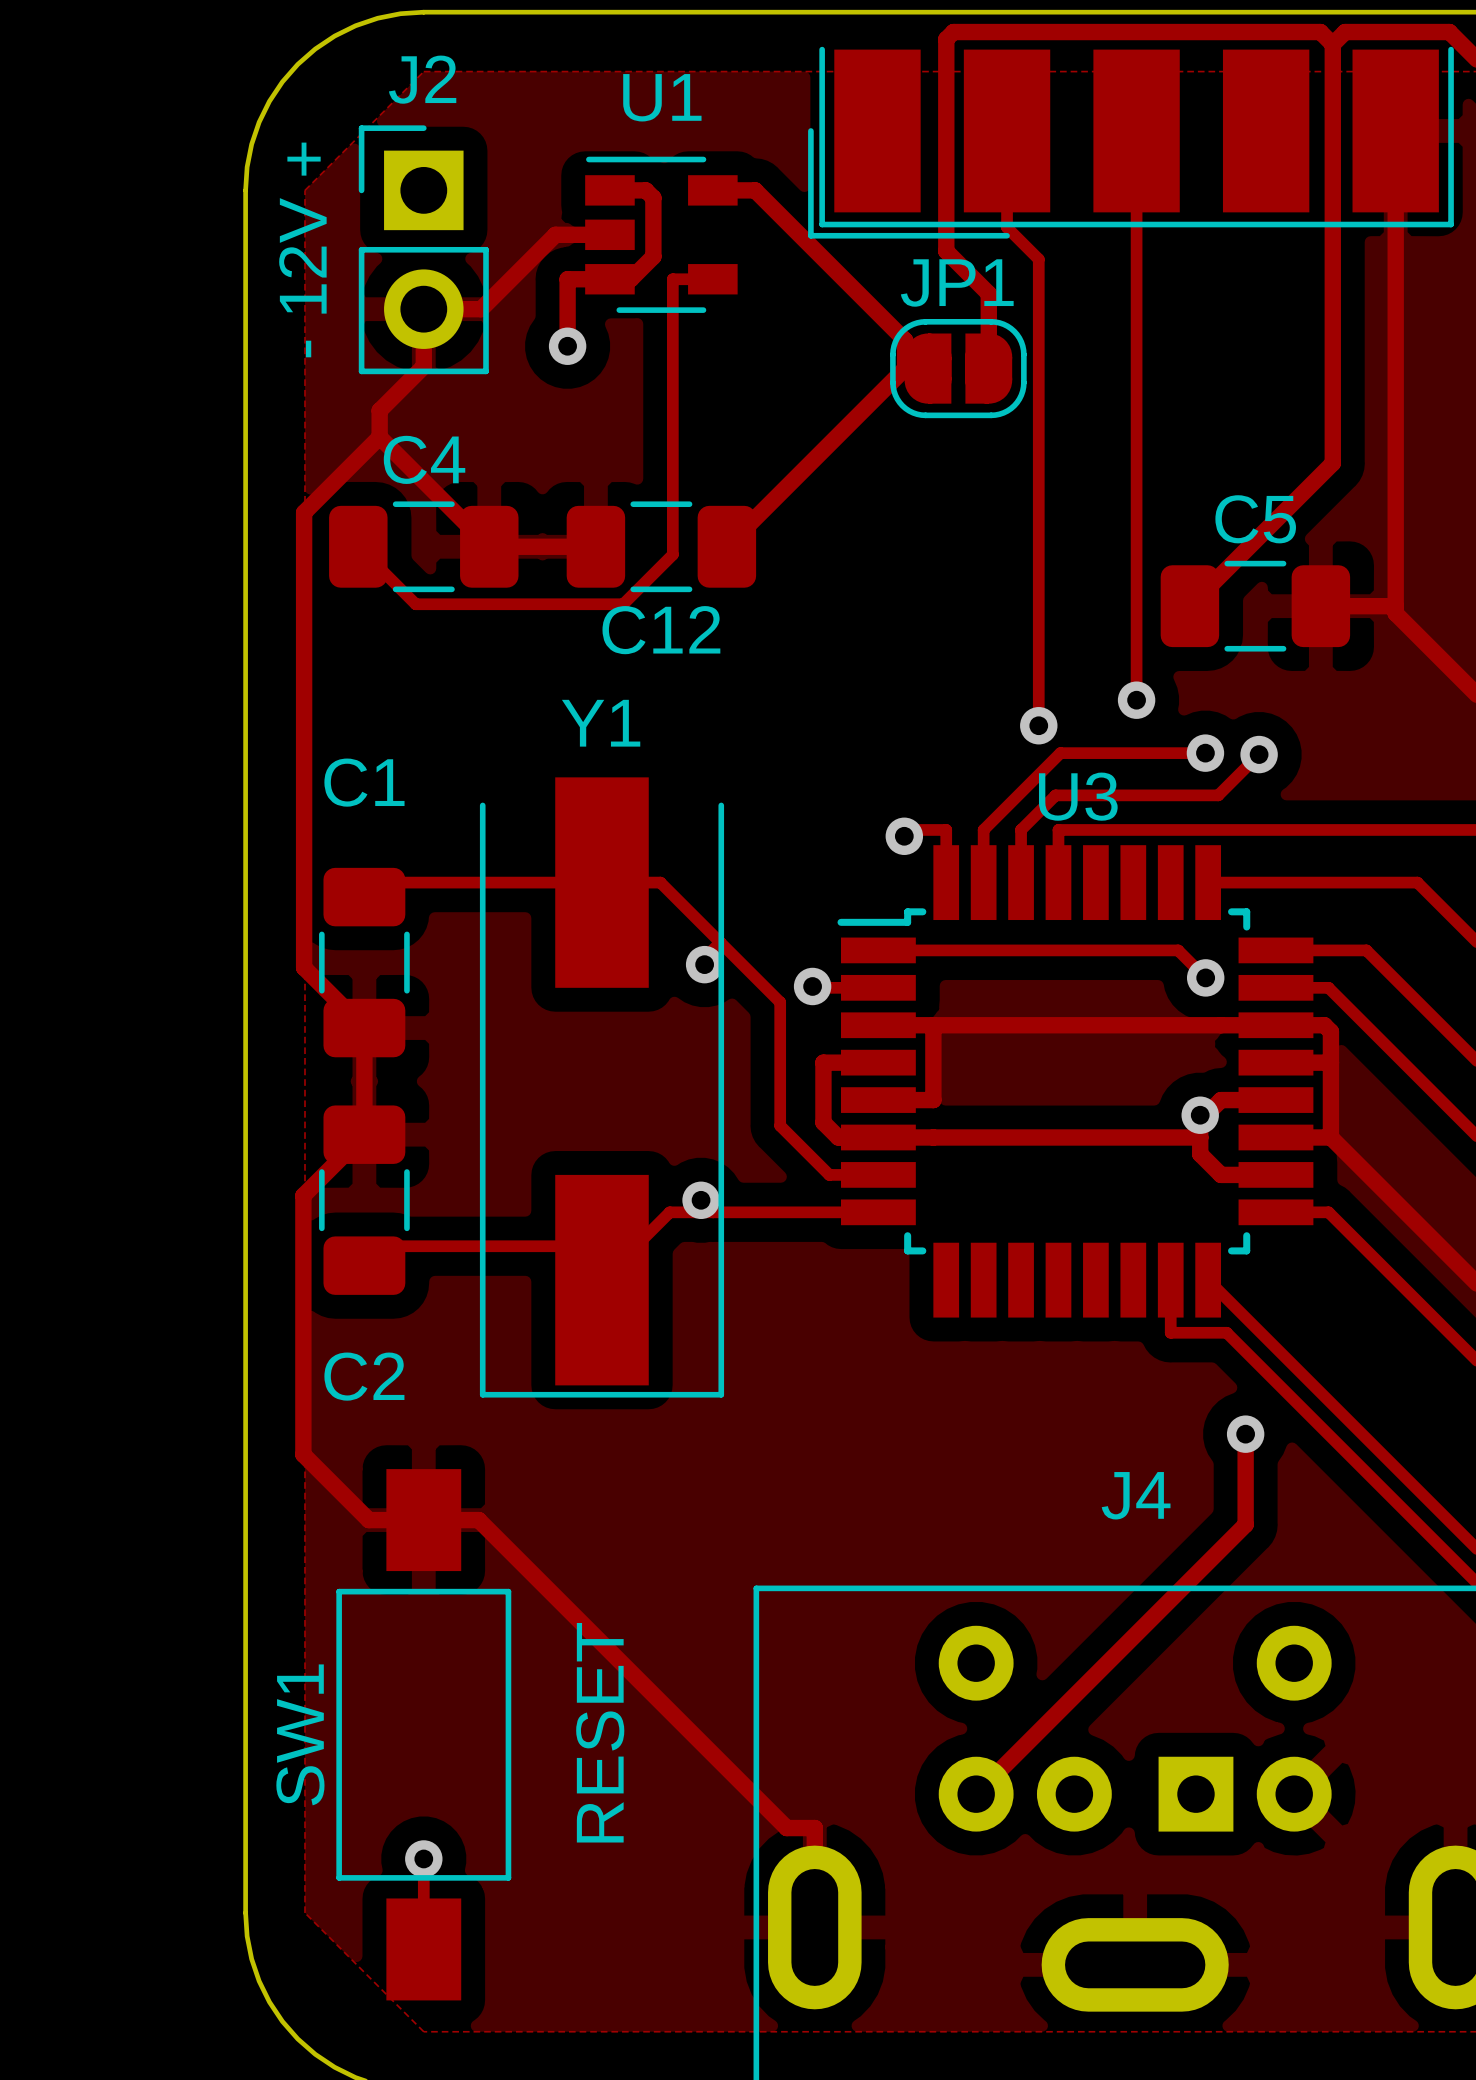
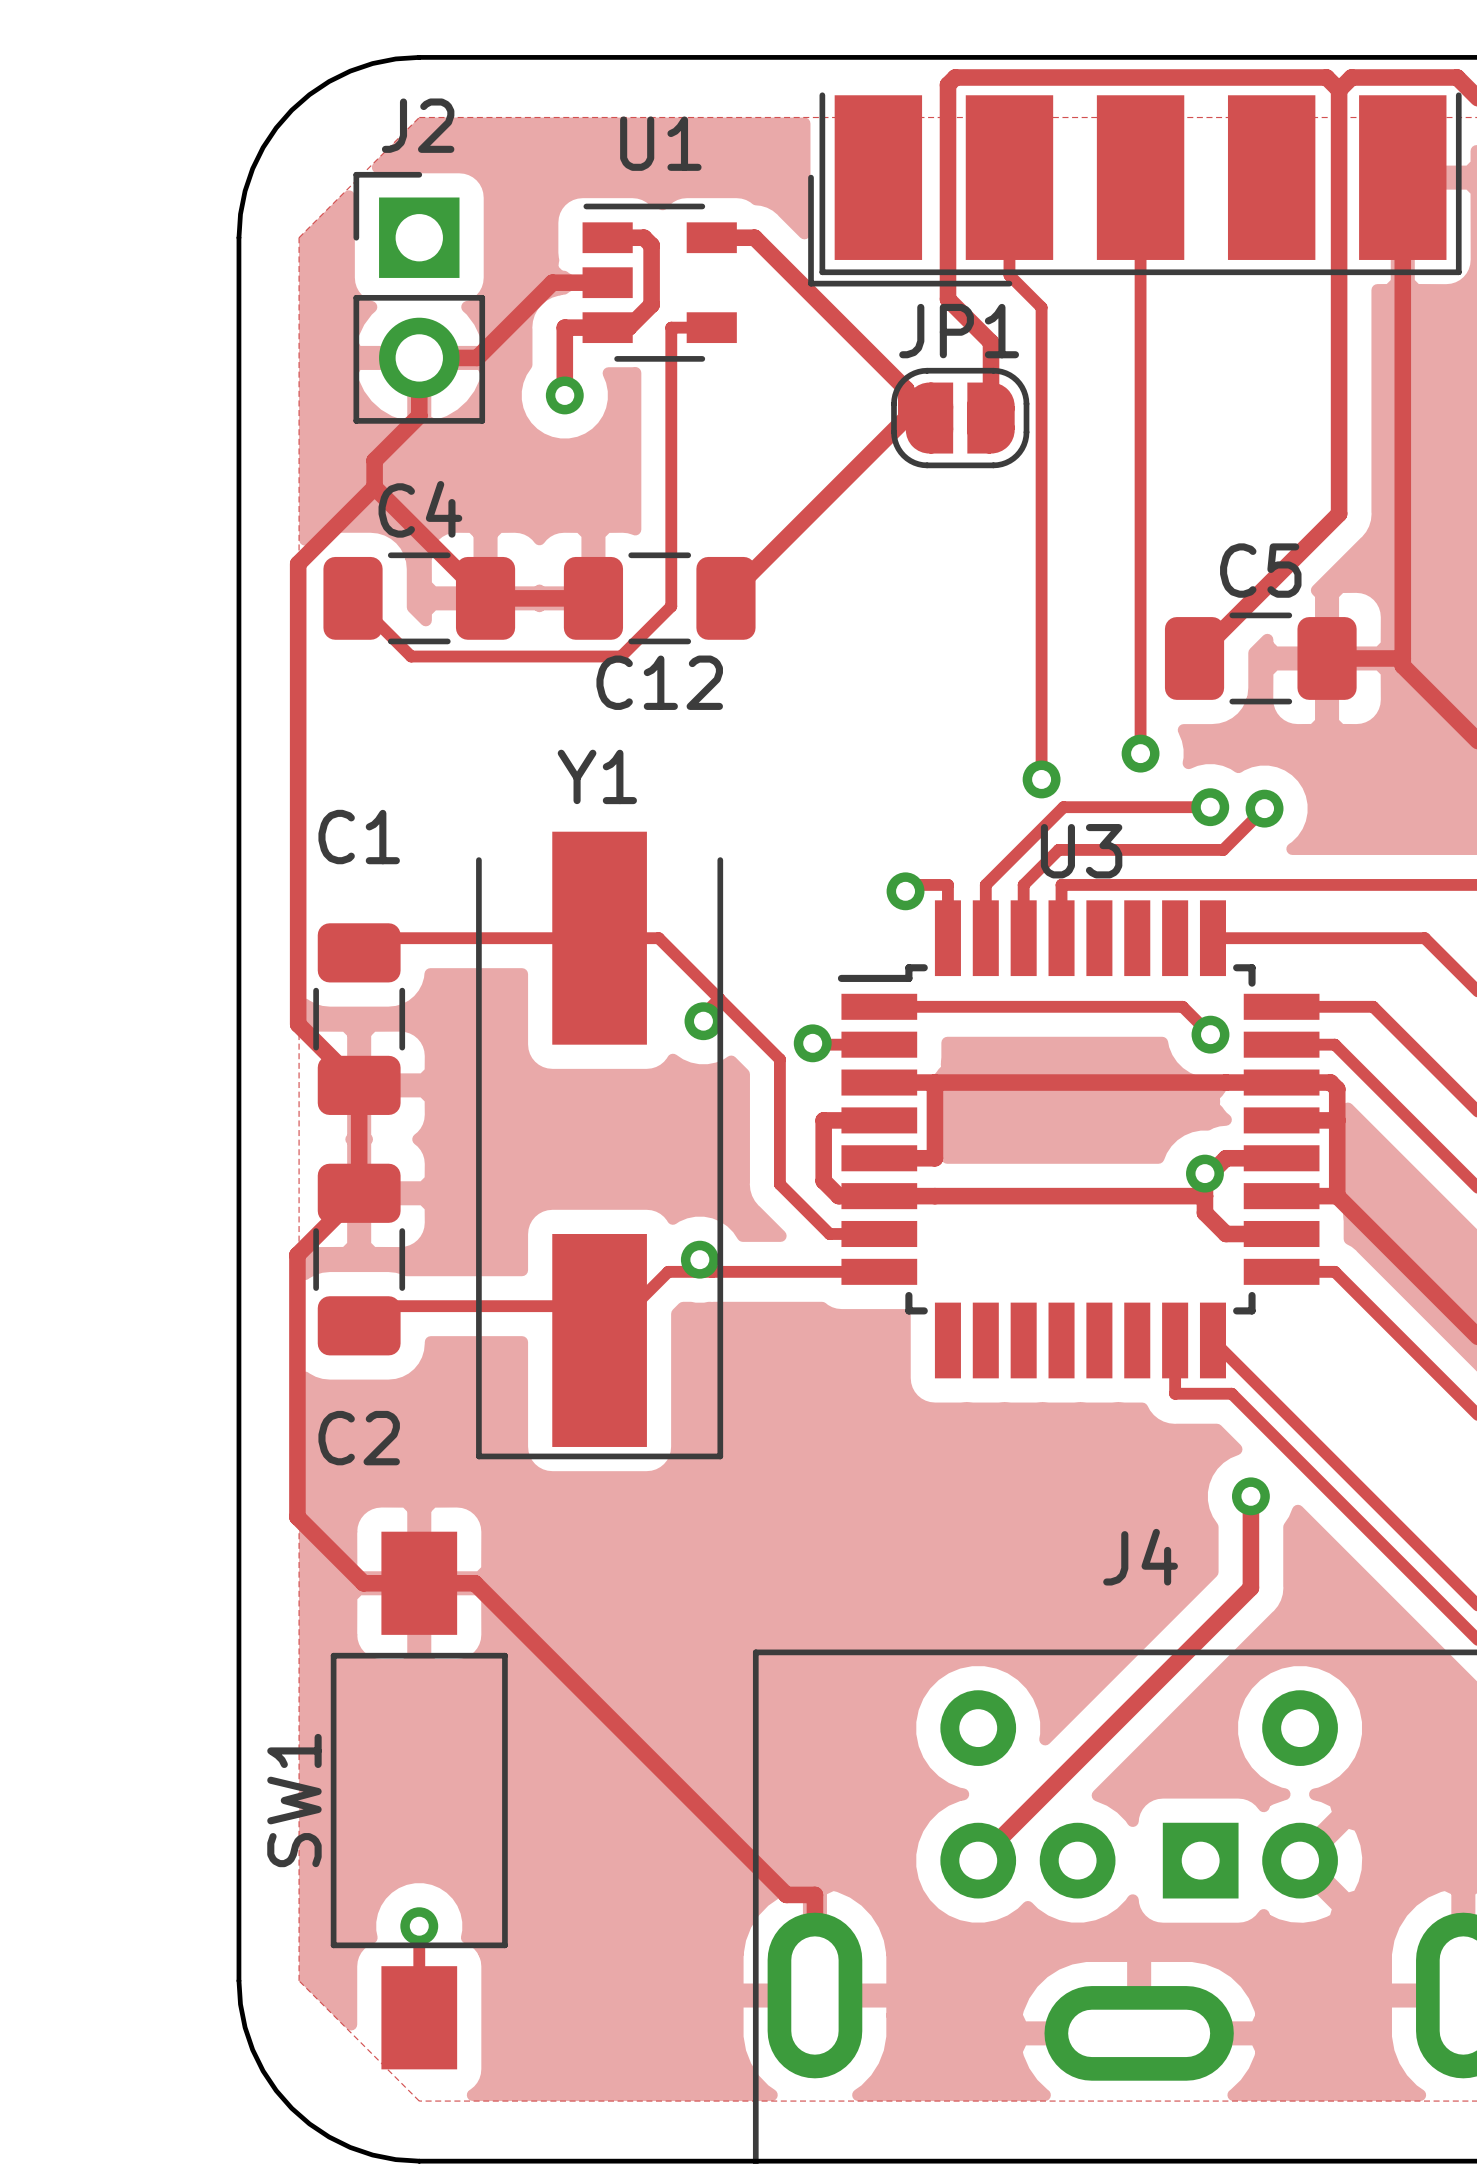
text: - 12V + (302, 249) -> none
text: RESET (600, 1732) -> none

